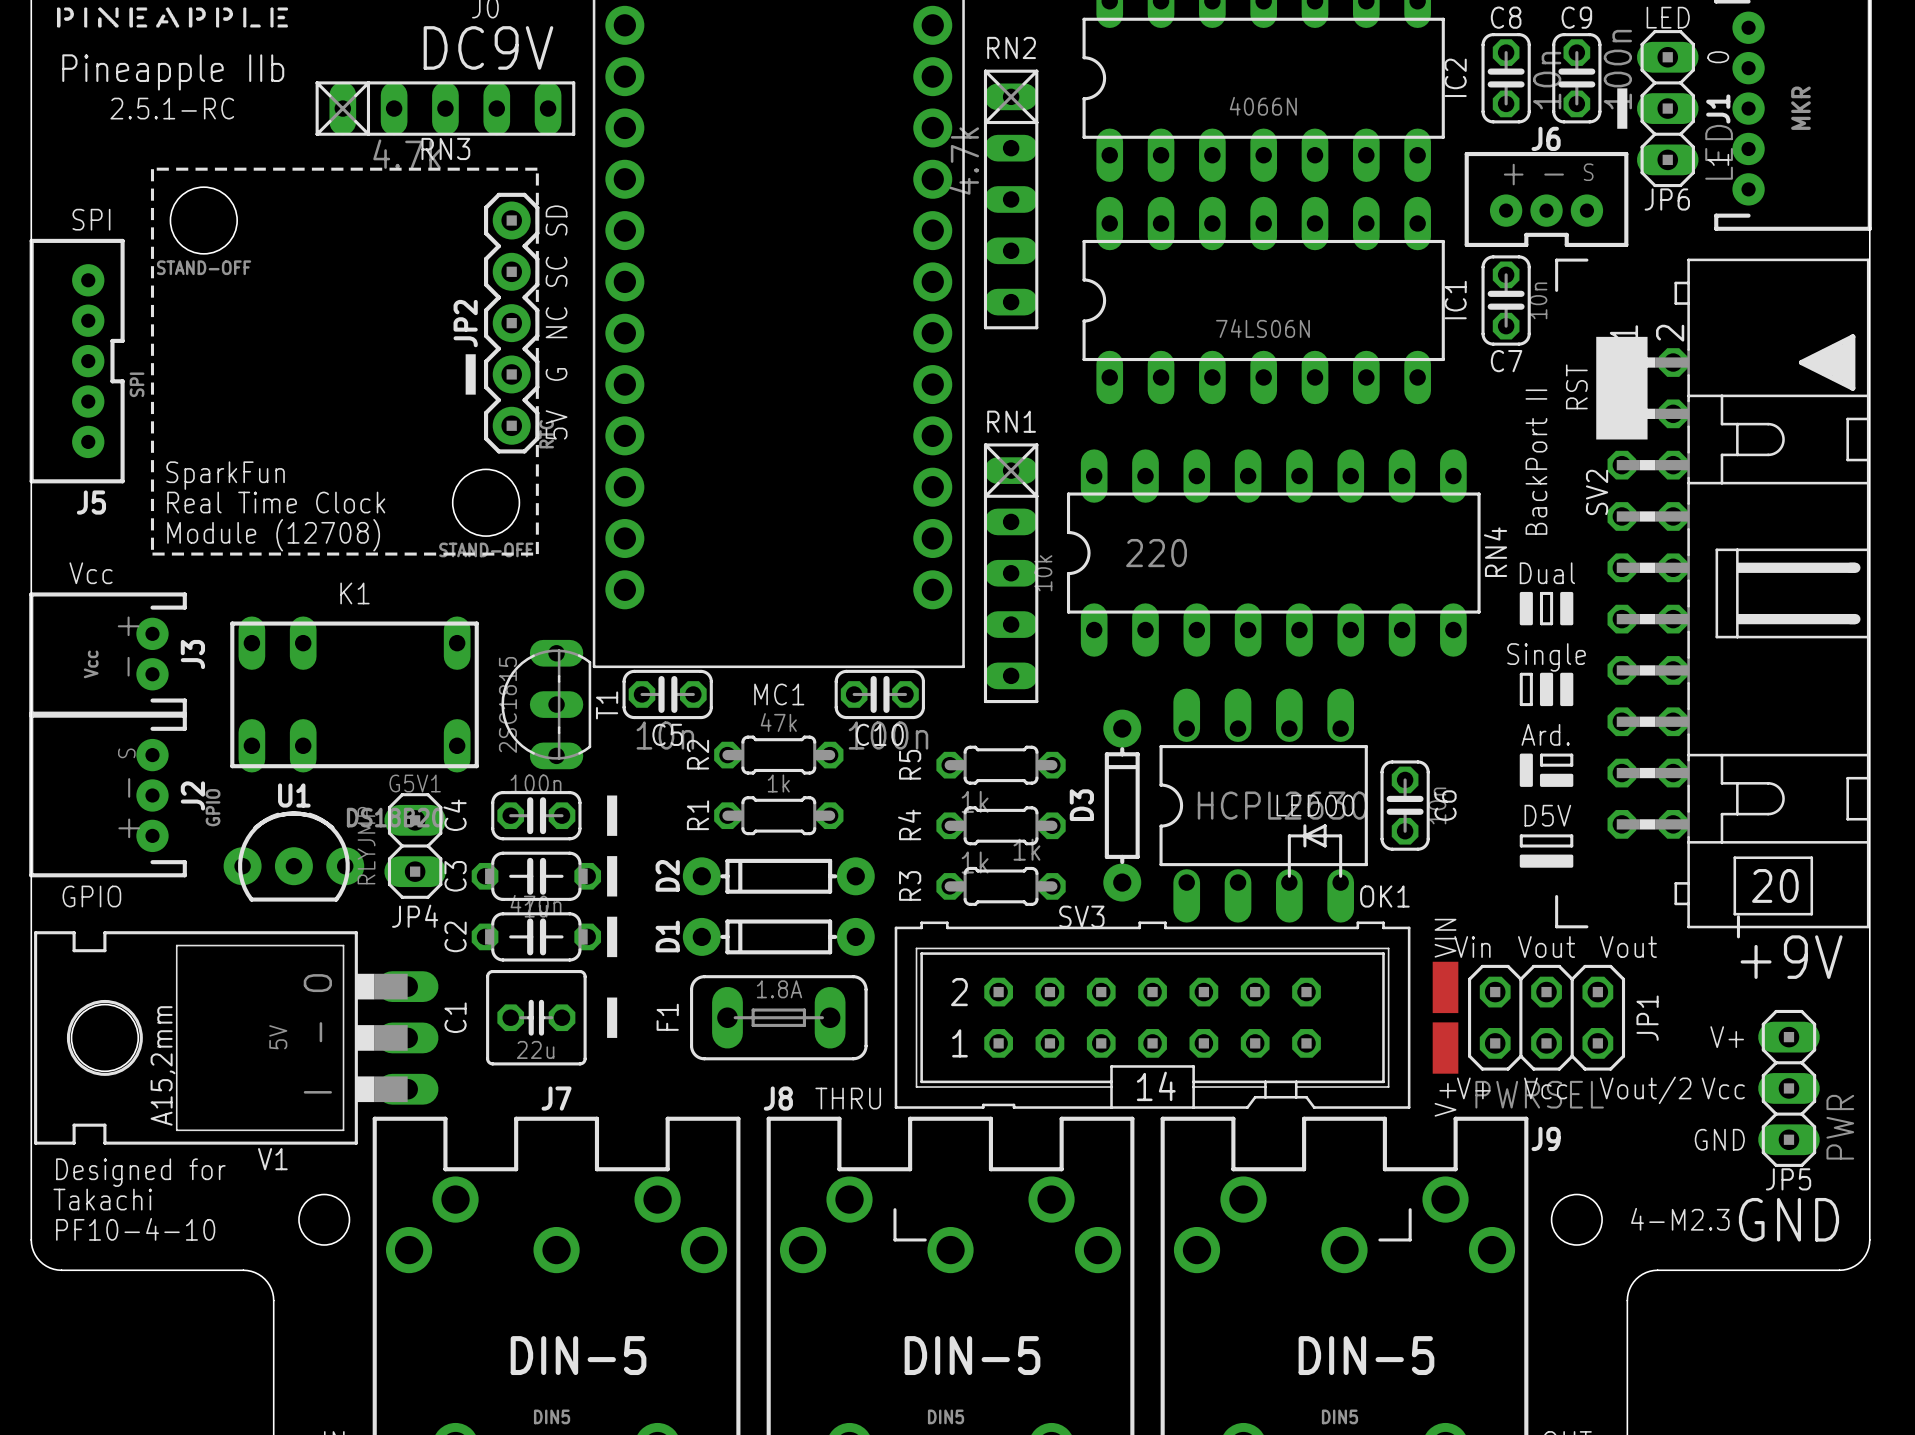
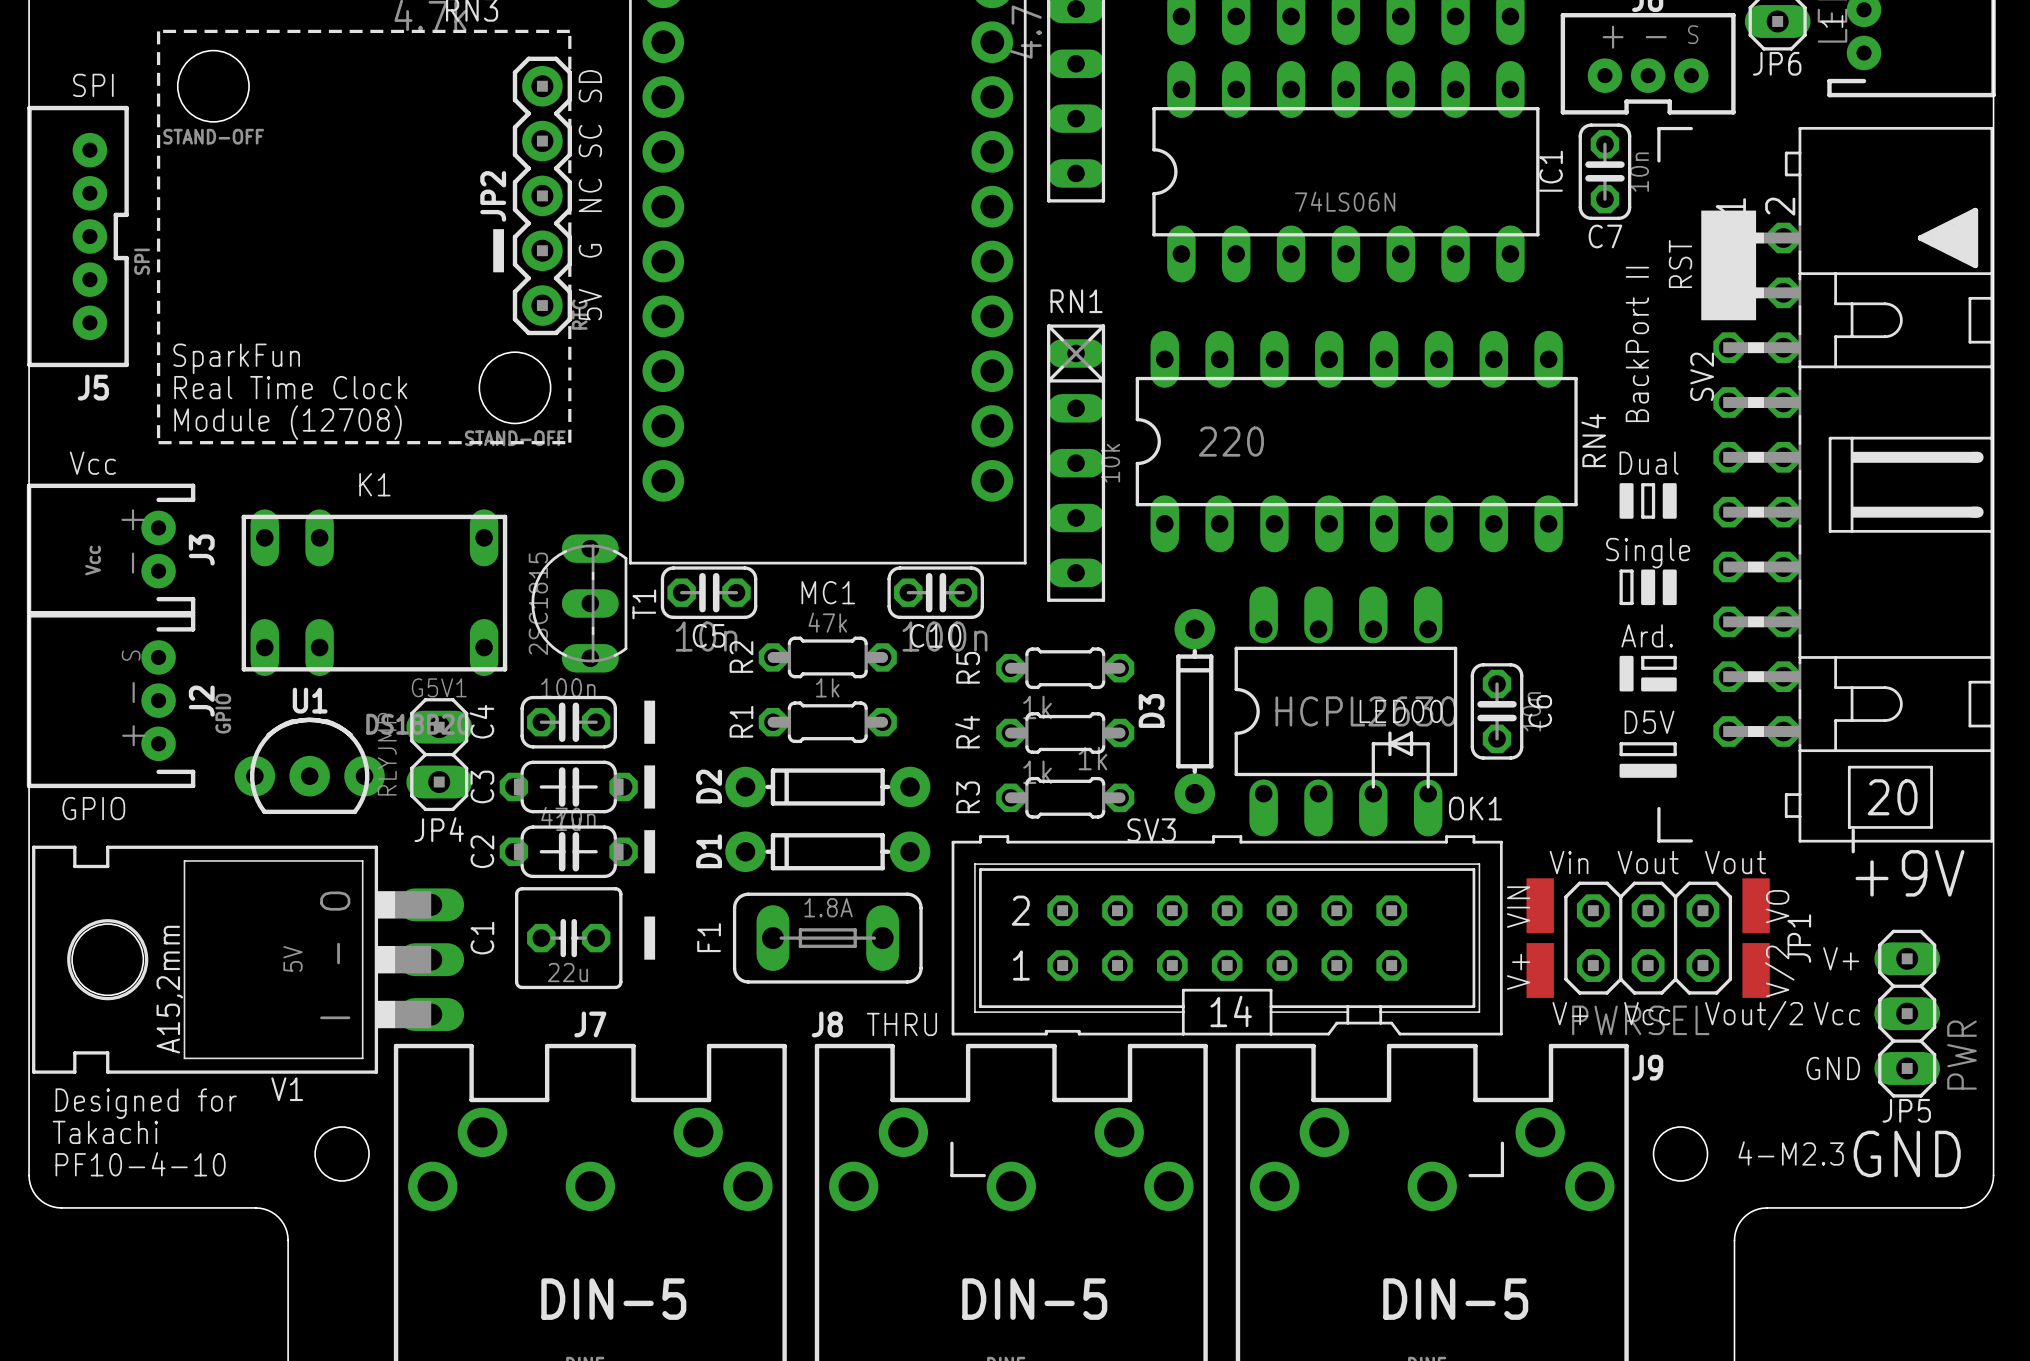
VIN name position: VIN (1445, 938) -> VIN (1518, 907)
VO: none -> (1756, 905)
JP1 name position: JP1 (1647, 1018) -> JP1 (1799, 938)
V/2: none -> (1756, 970)
V+ name position: V+ (1445, 1099) -> V+ (1518, 971)

